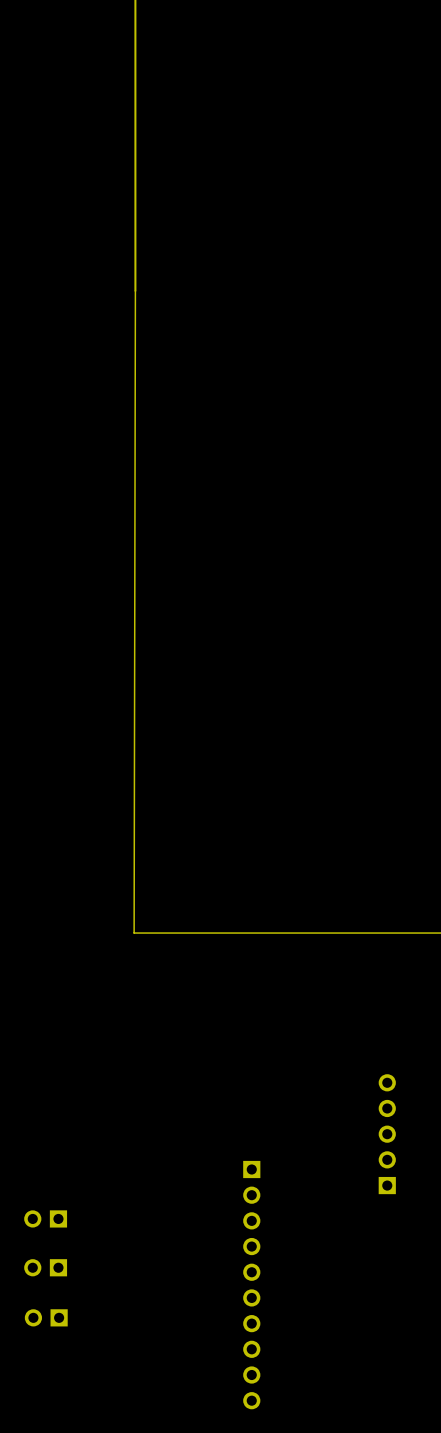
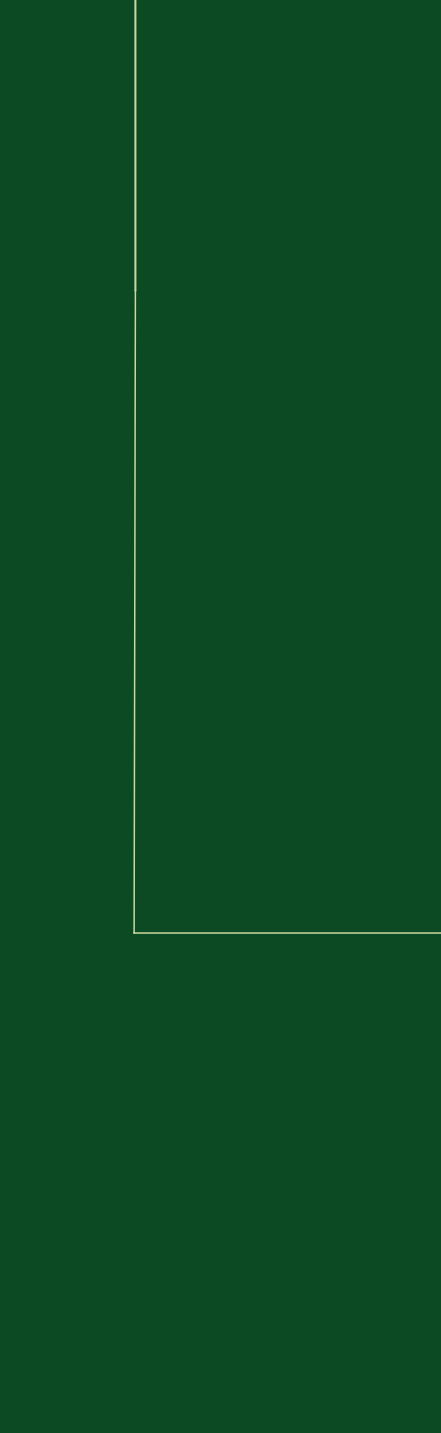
part: (387, 1134) -> none
part: (45, 1218) -> none
part: (45, 1267) -> none
part: (251, 1285) -> none
part: (46, 1317) -> none

